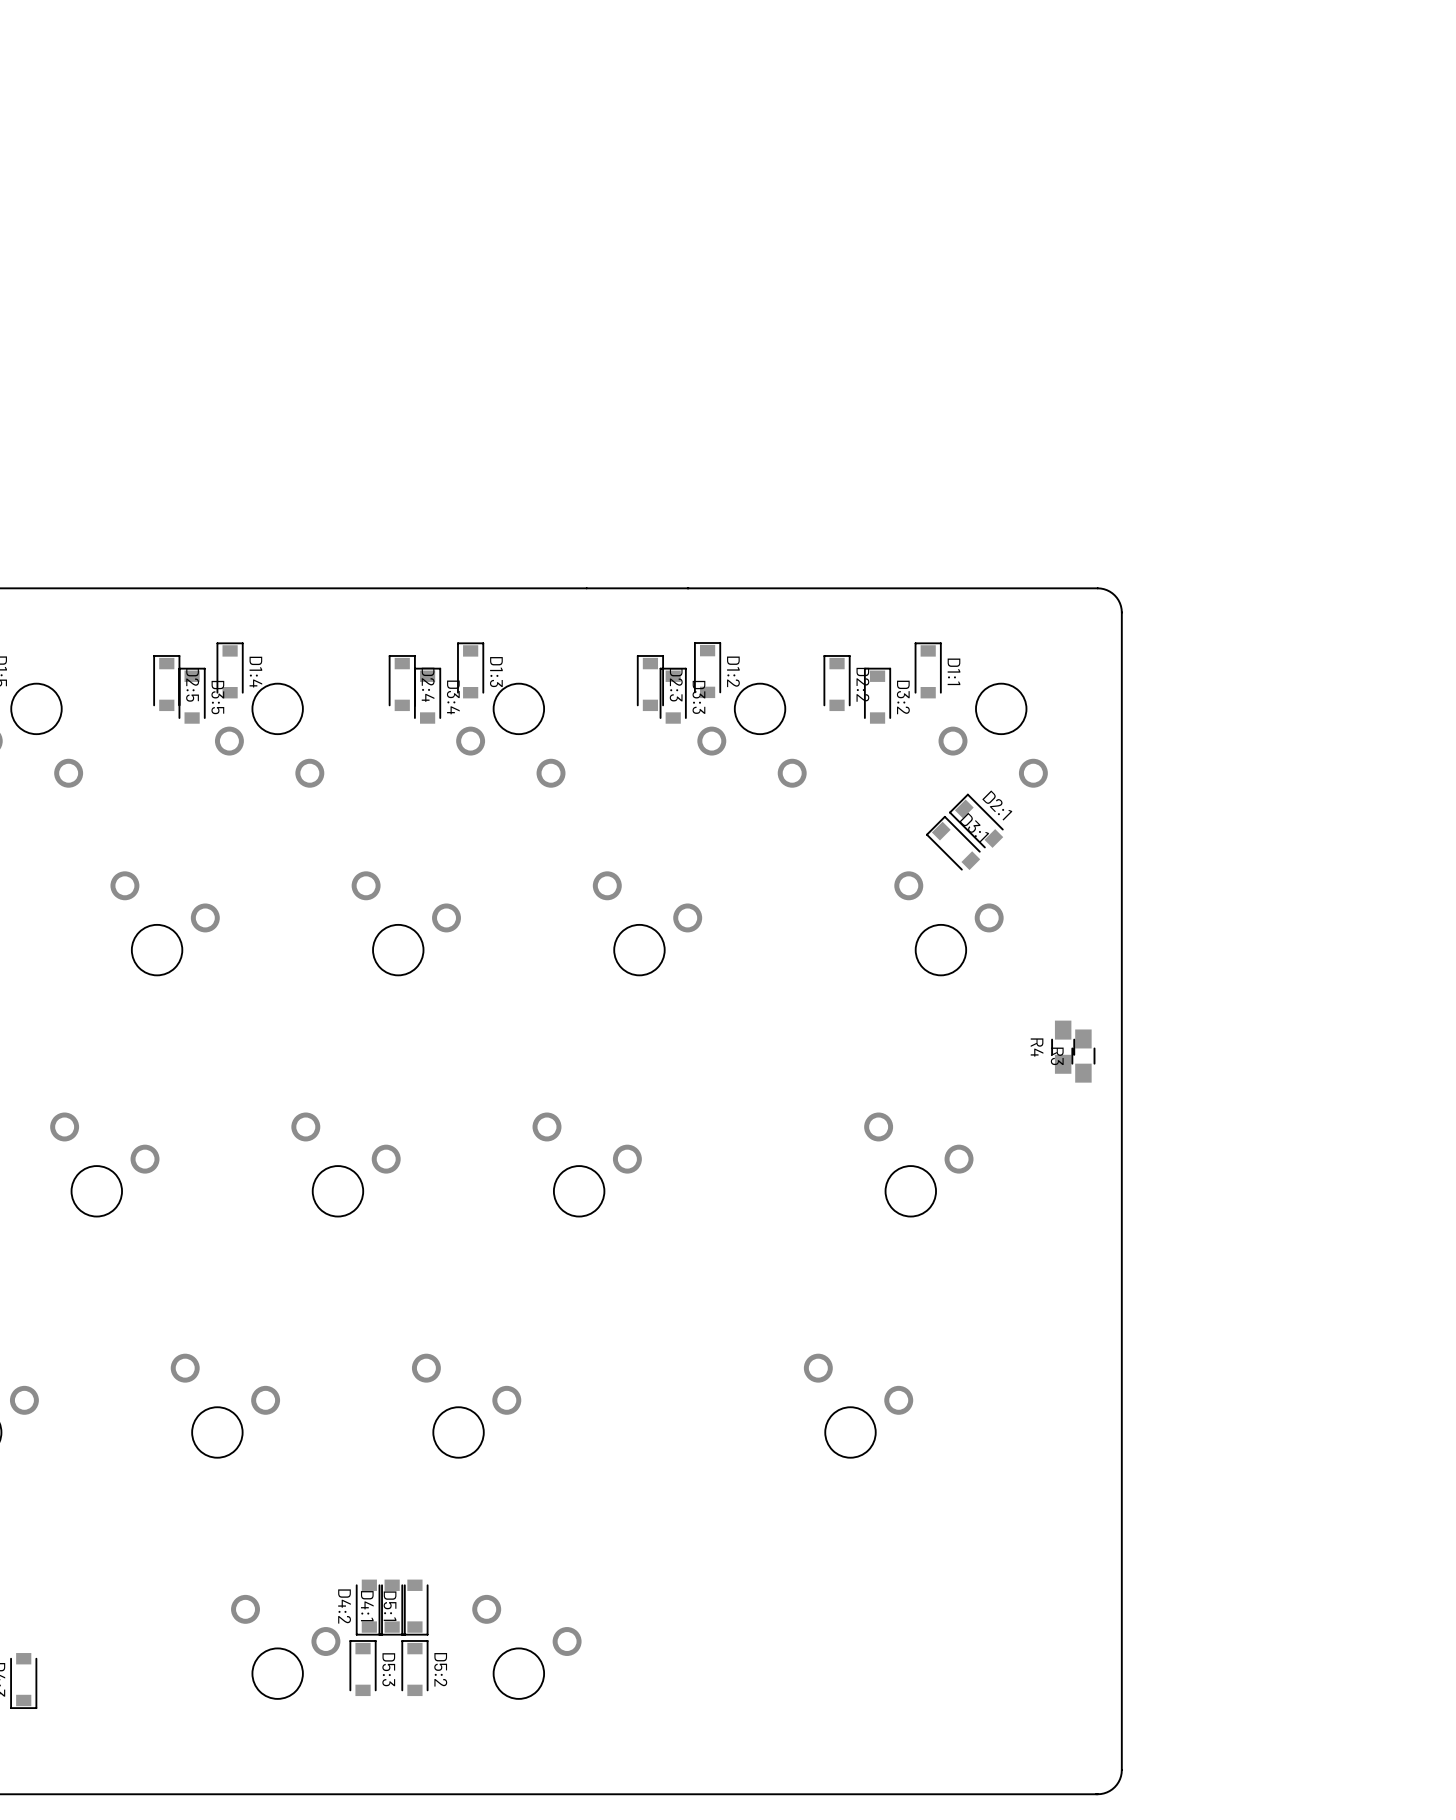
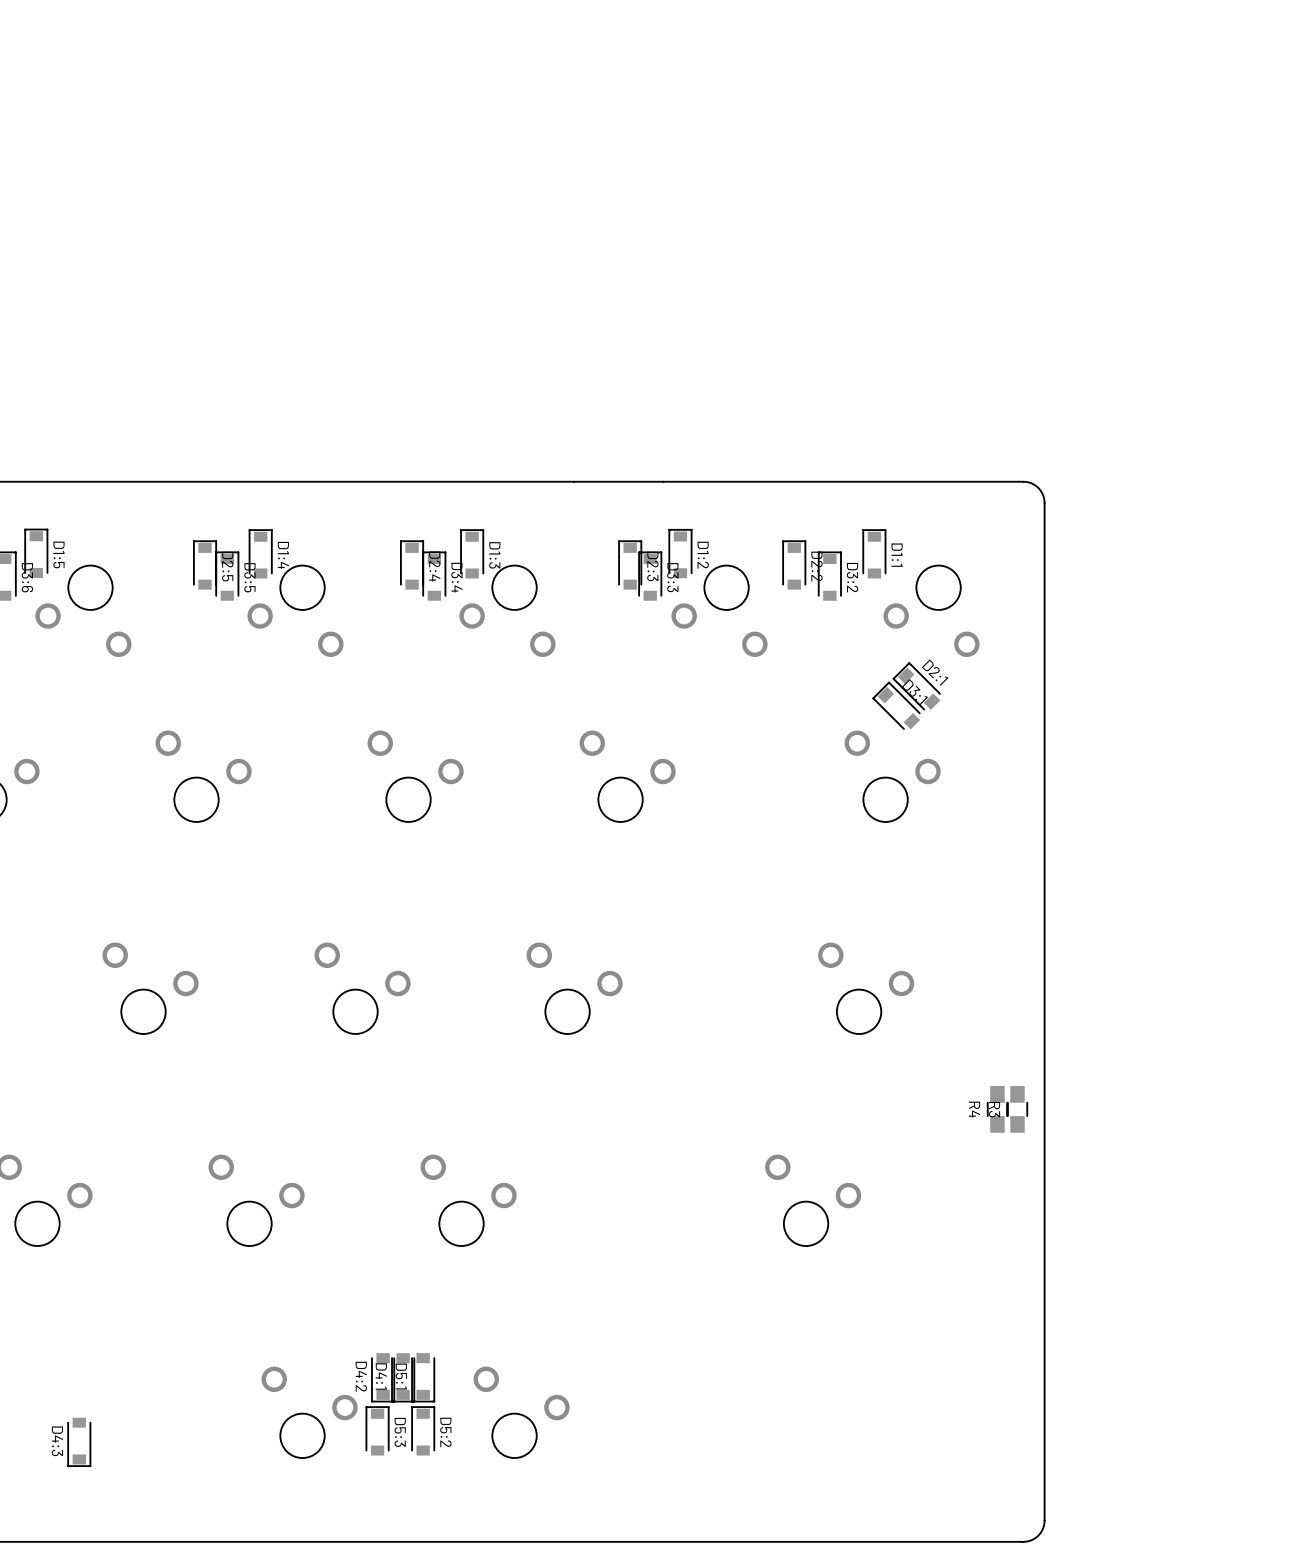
R4 position: (1063, 1047) -> (997, 1109)
R3 position: (1083, 1056) -> (1017, 1109)

